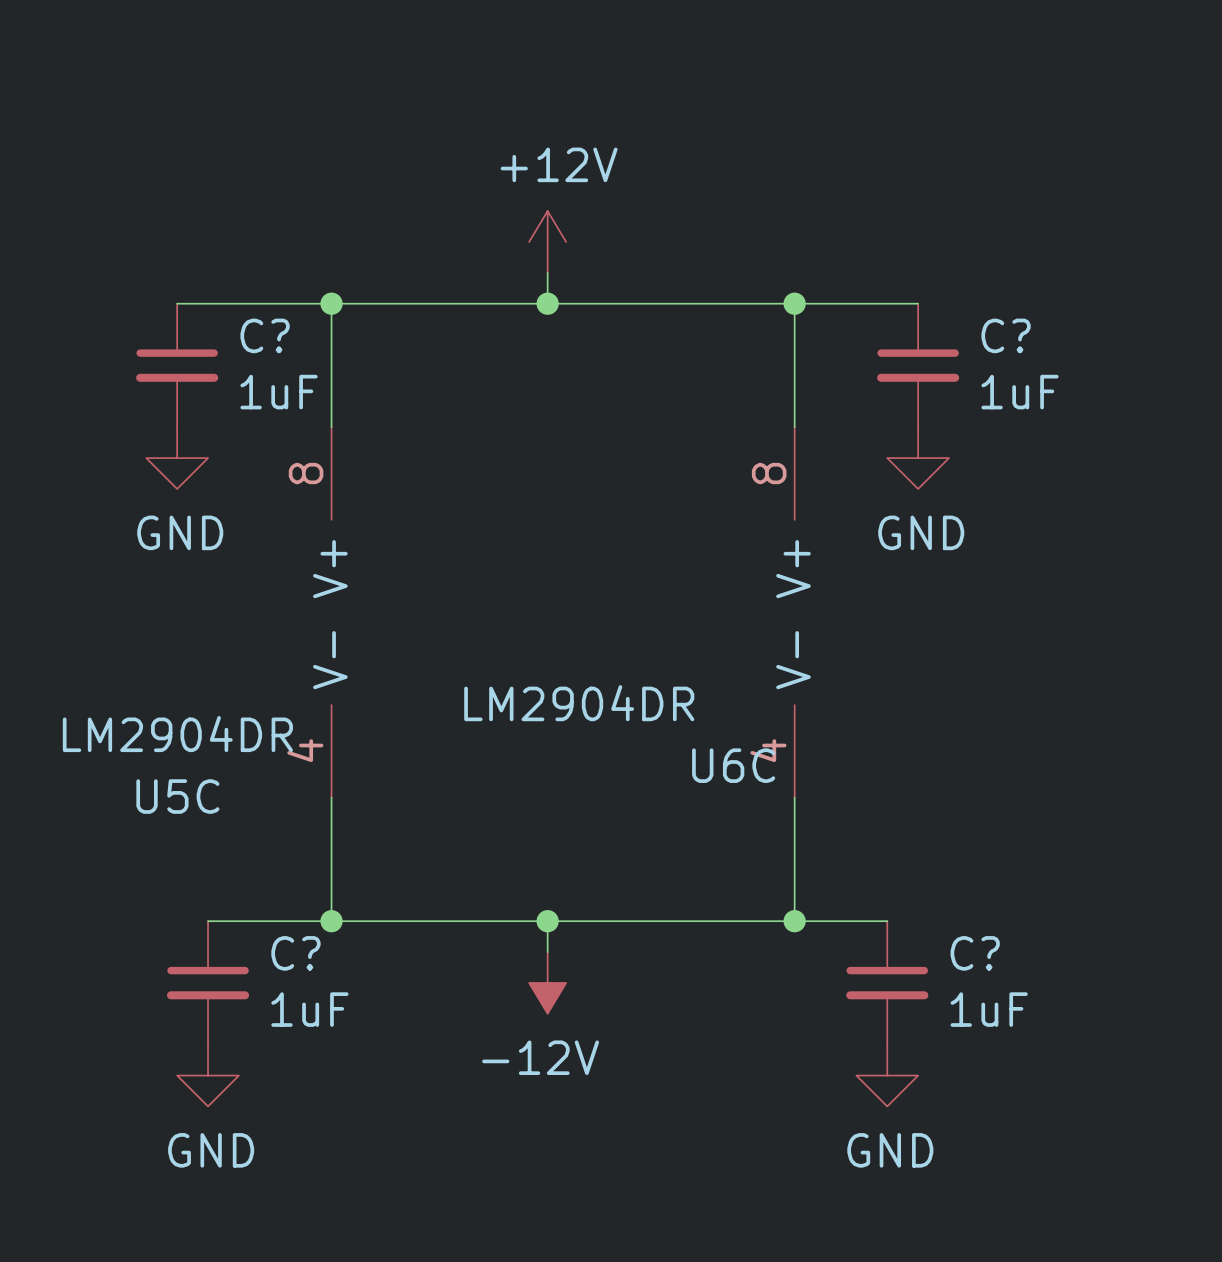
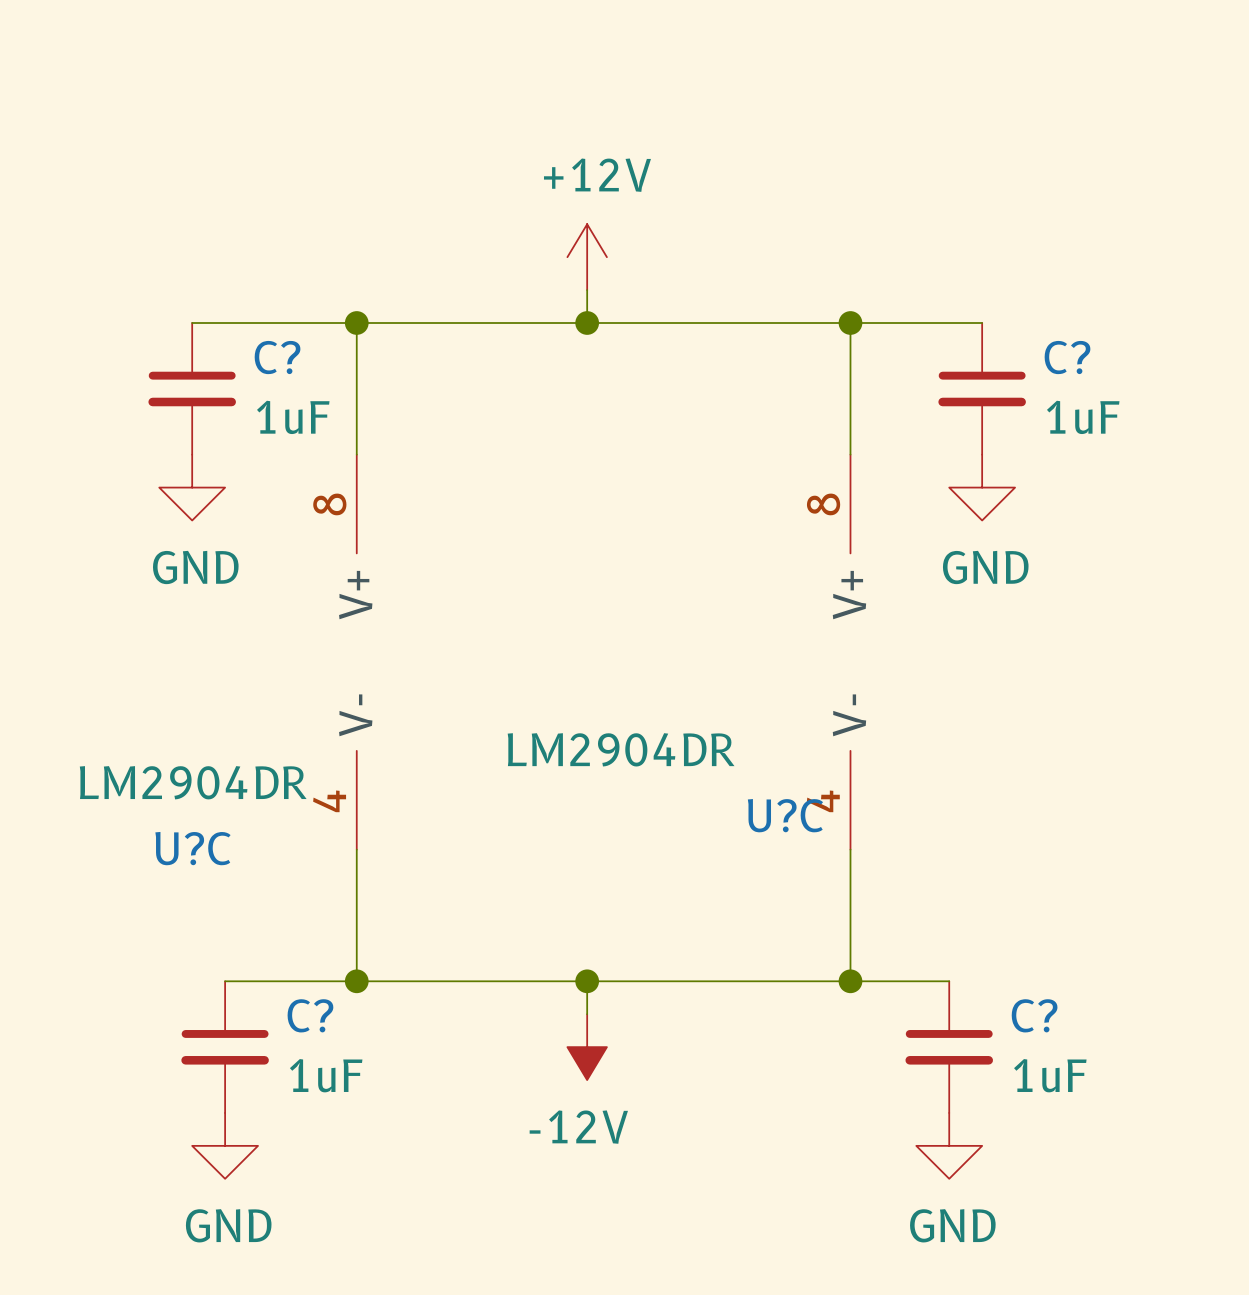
U6C name: U6C (733, 765) -> U?C (785, 815)
U5C name: U5C (177, 796) -> U?C (192, 848)

